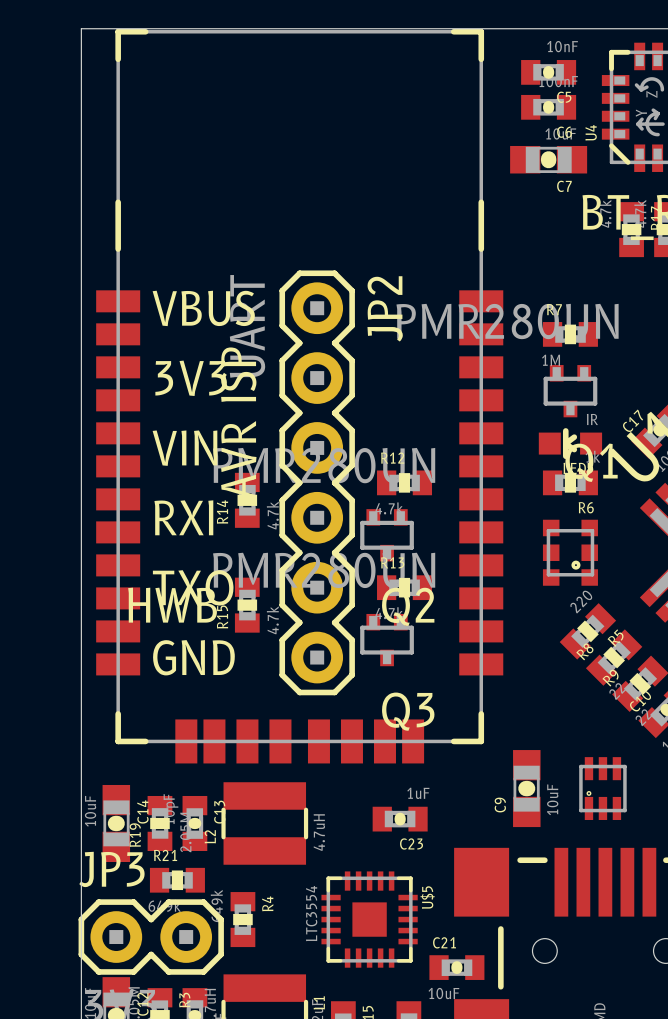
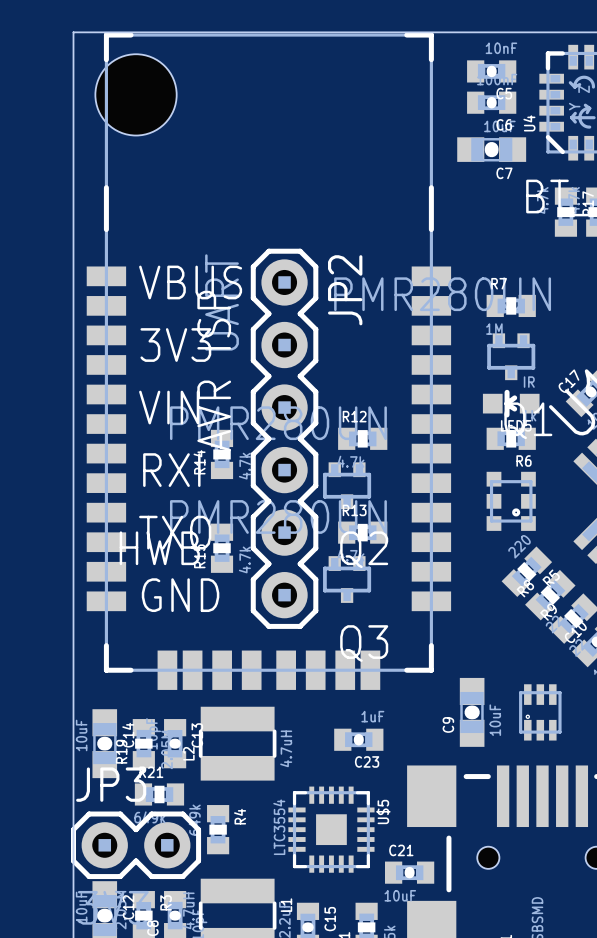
part: none -> (136, 94)

